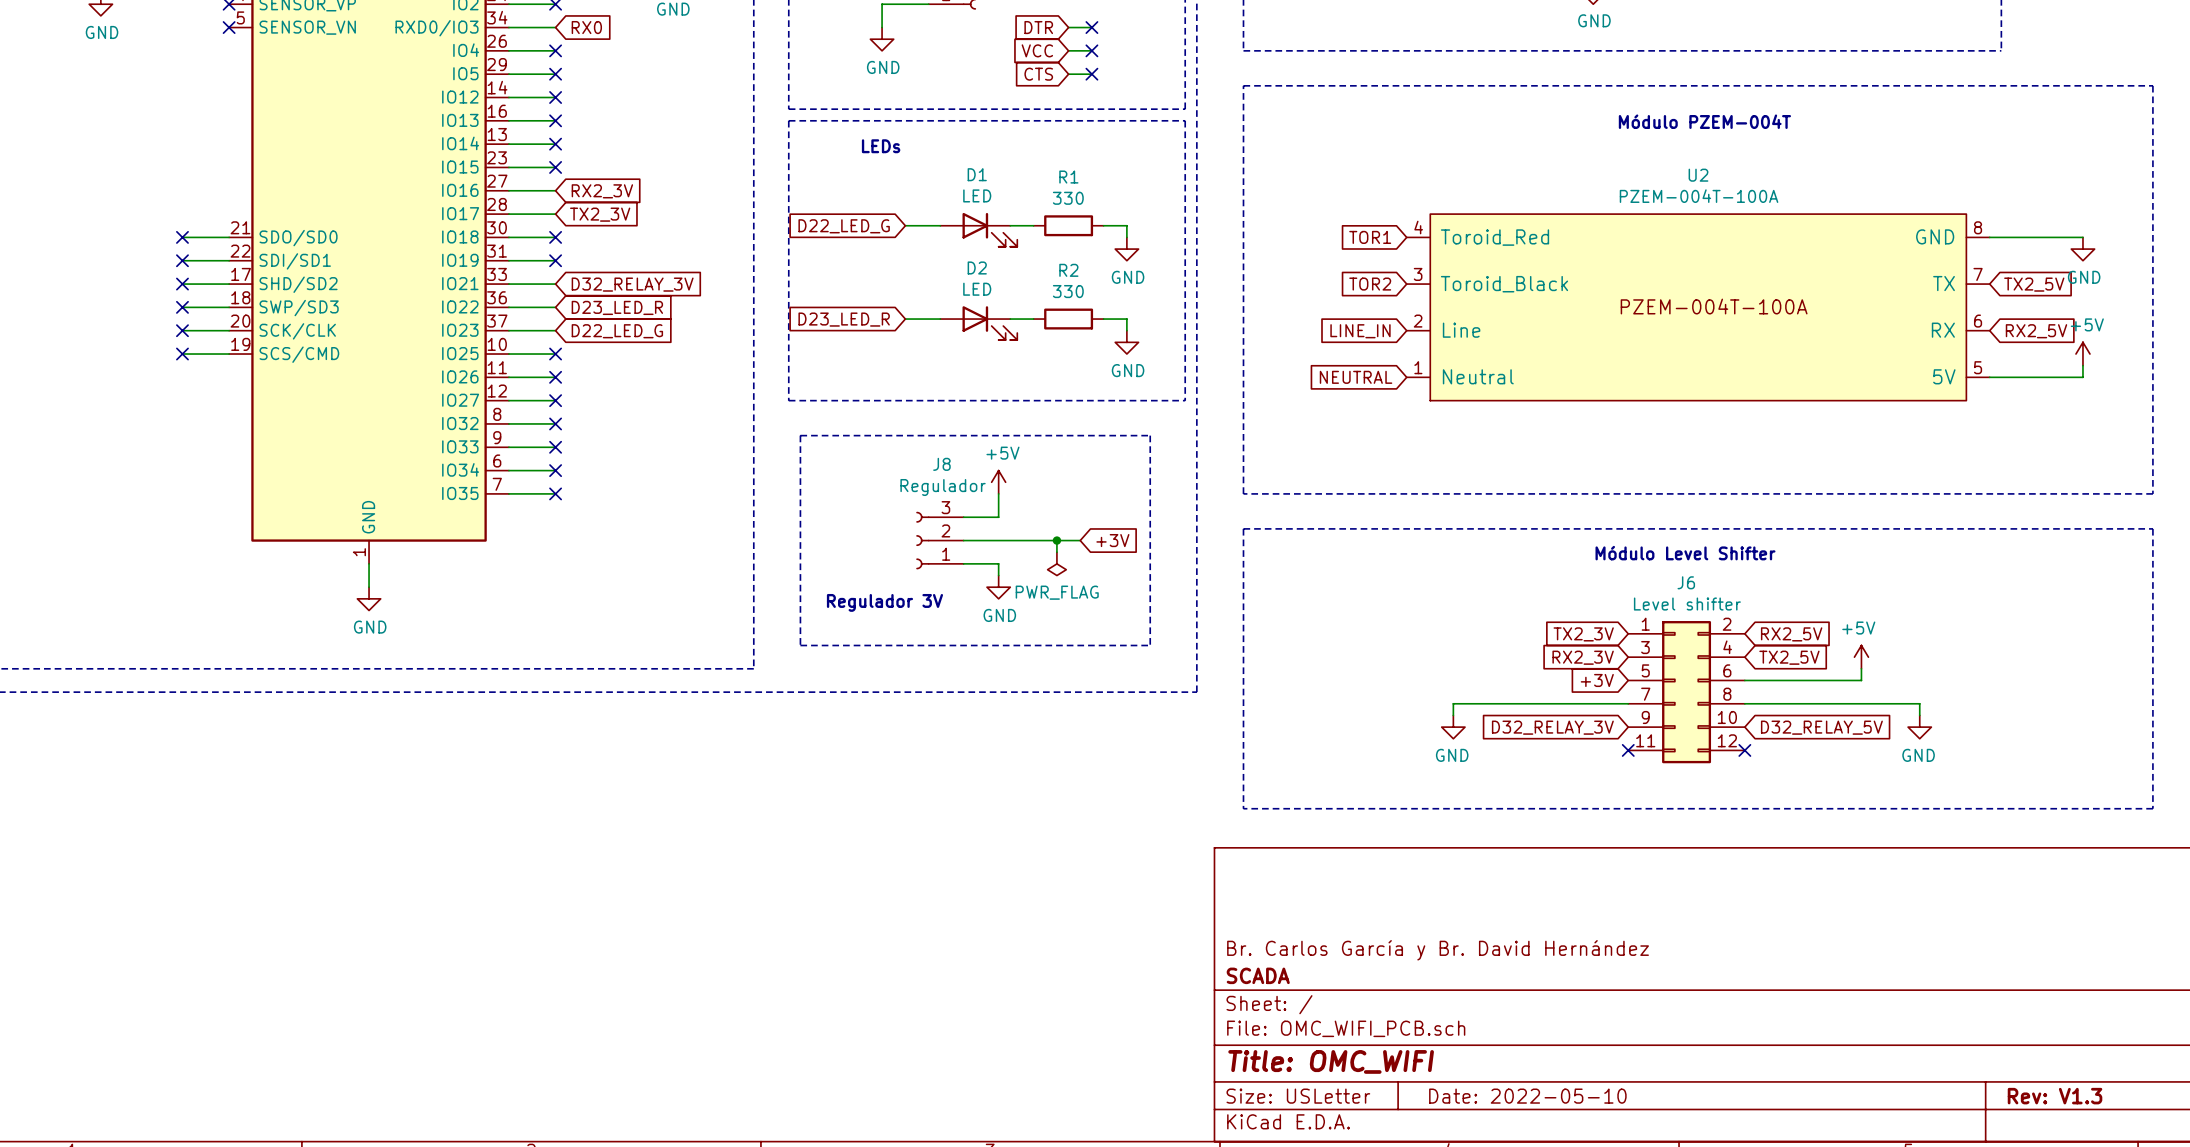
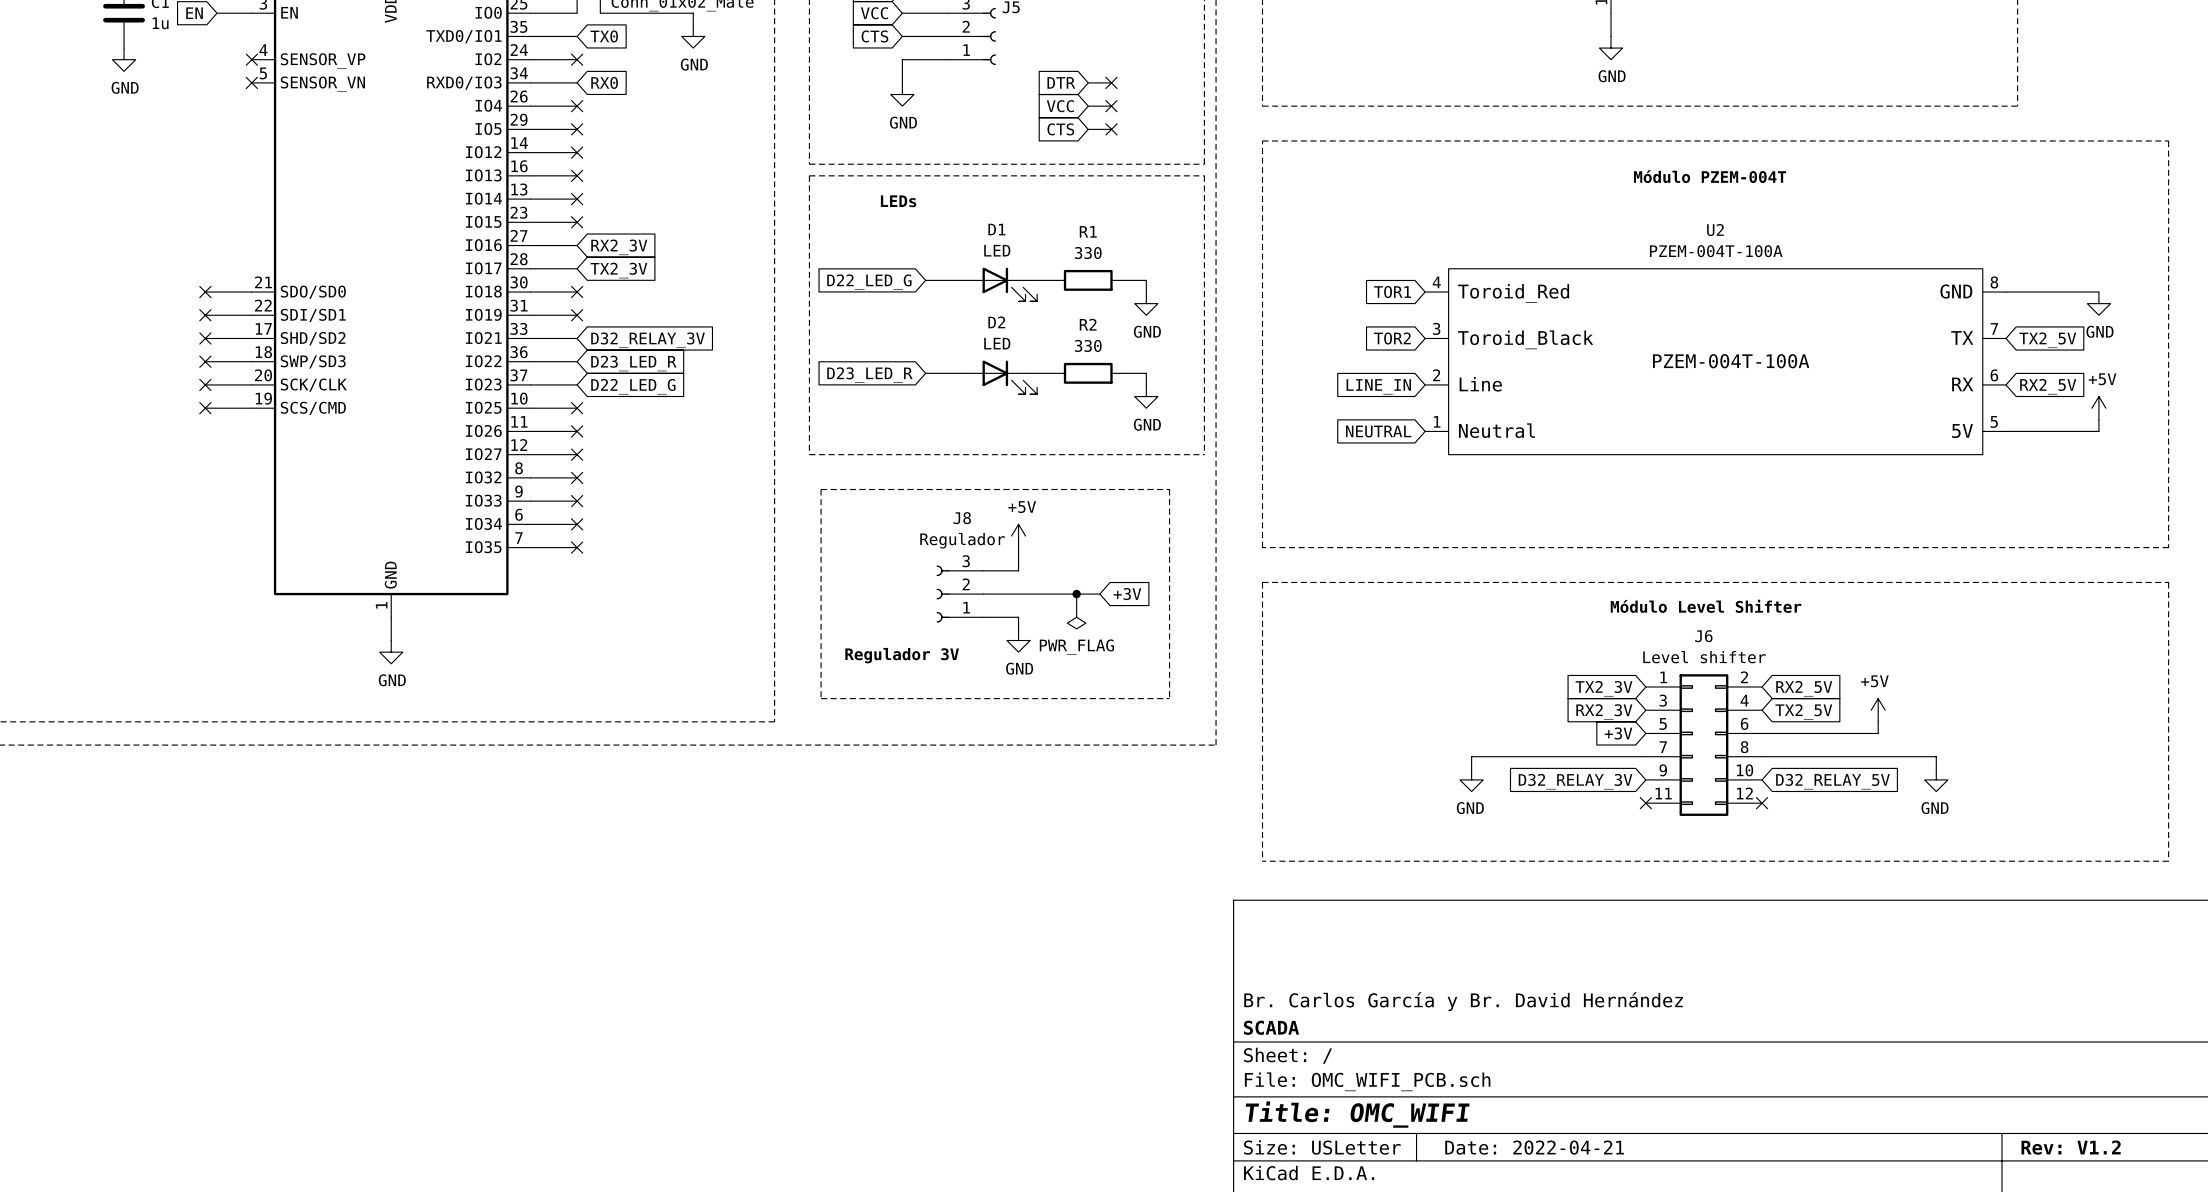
title block: Date: 2022-05-10 (1527, 1096) -> Date: 2022-04-21 (1534, 1147)
title block: Rev: V1.3 (2055, 1096) -> Rev: V1.2 (2071, 1147)

